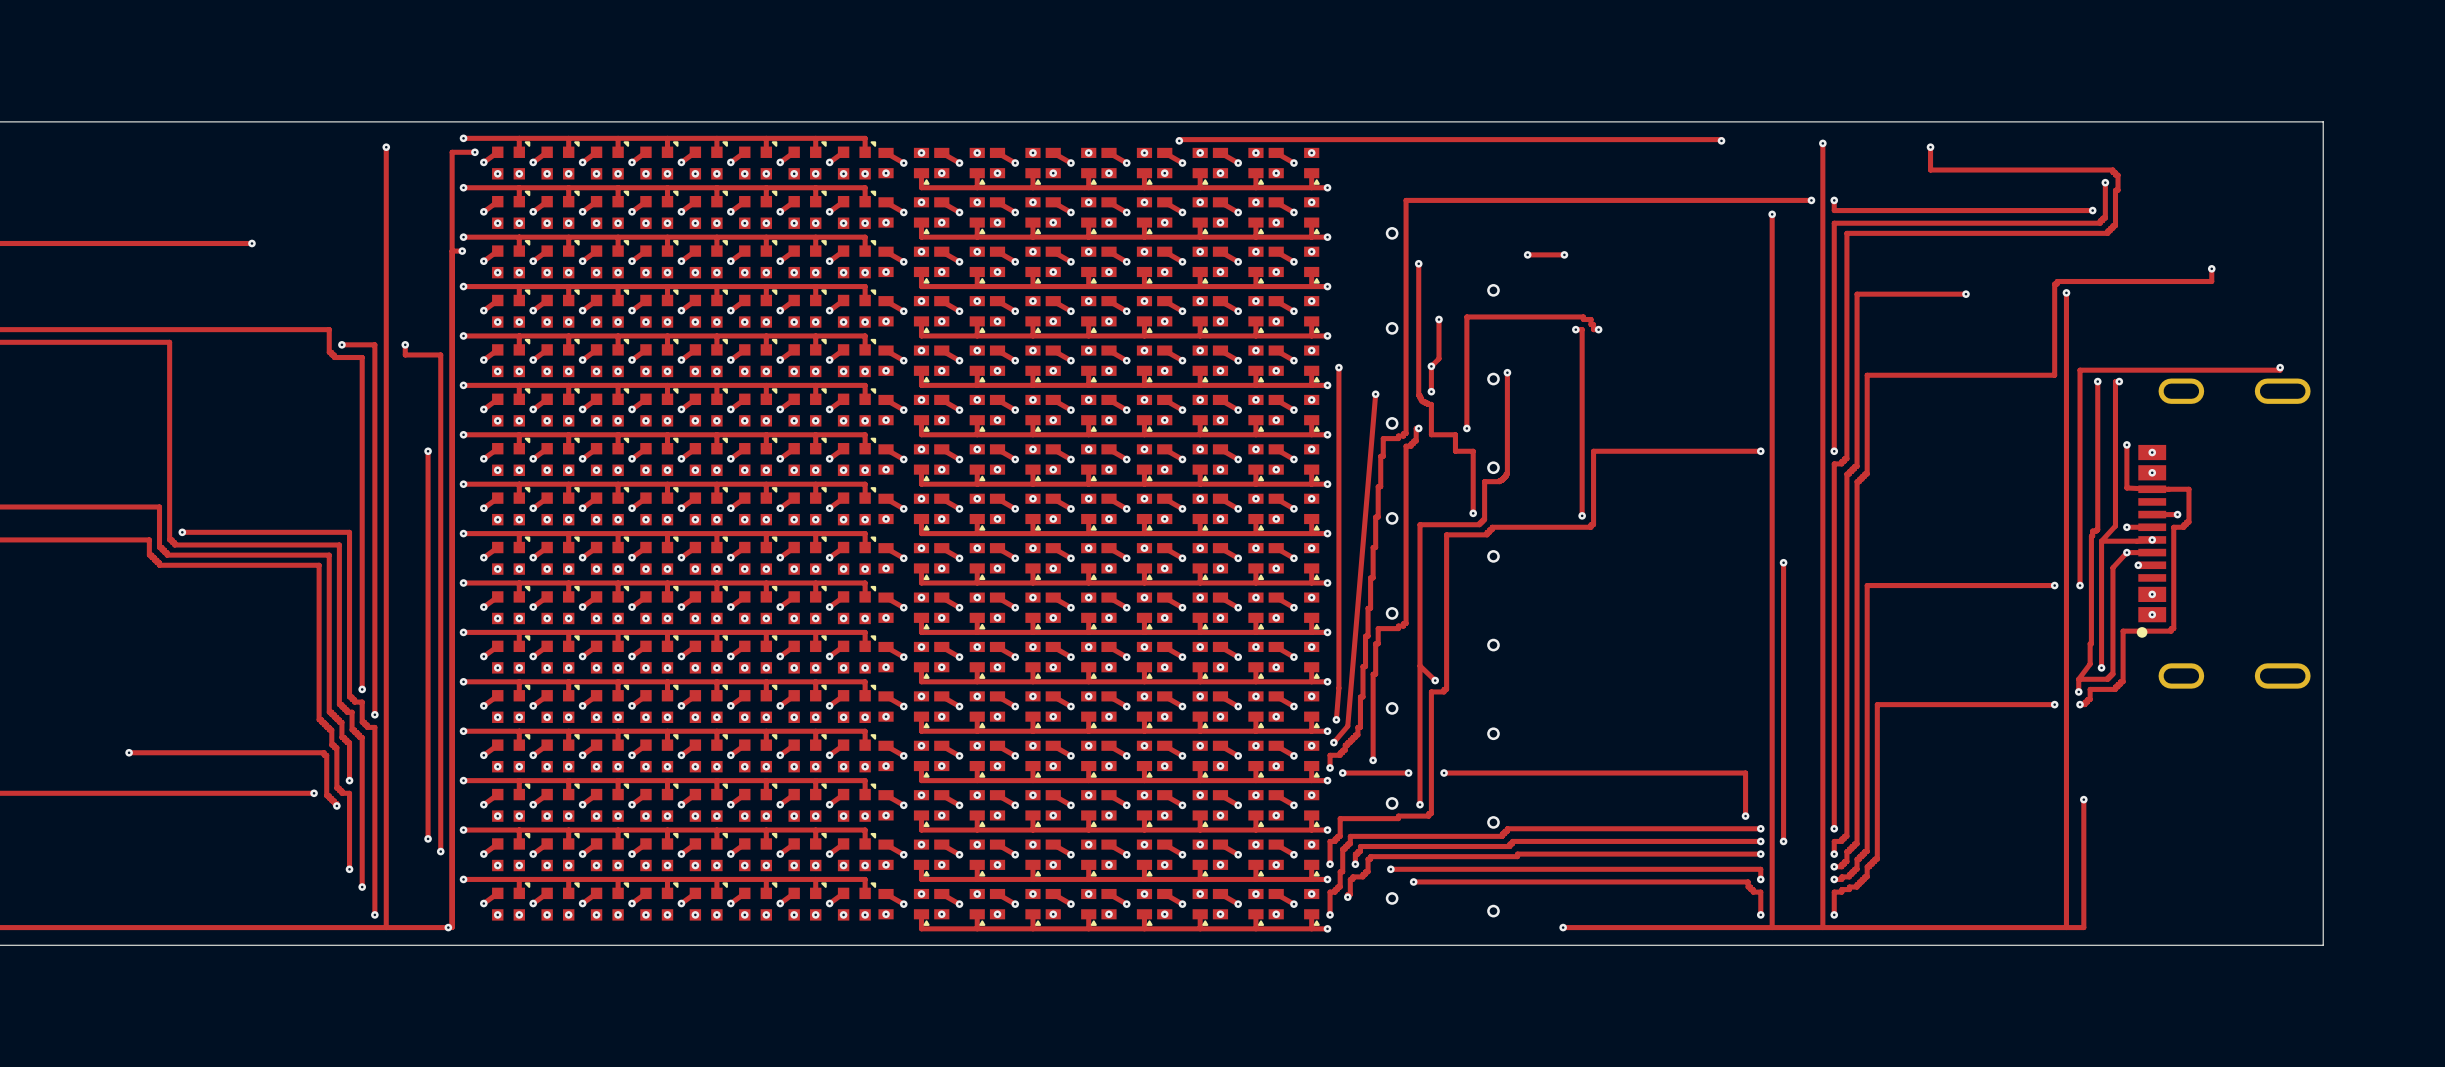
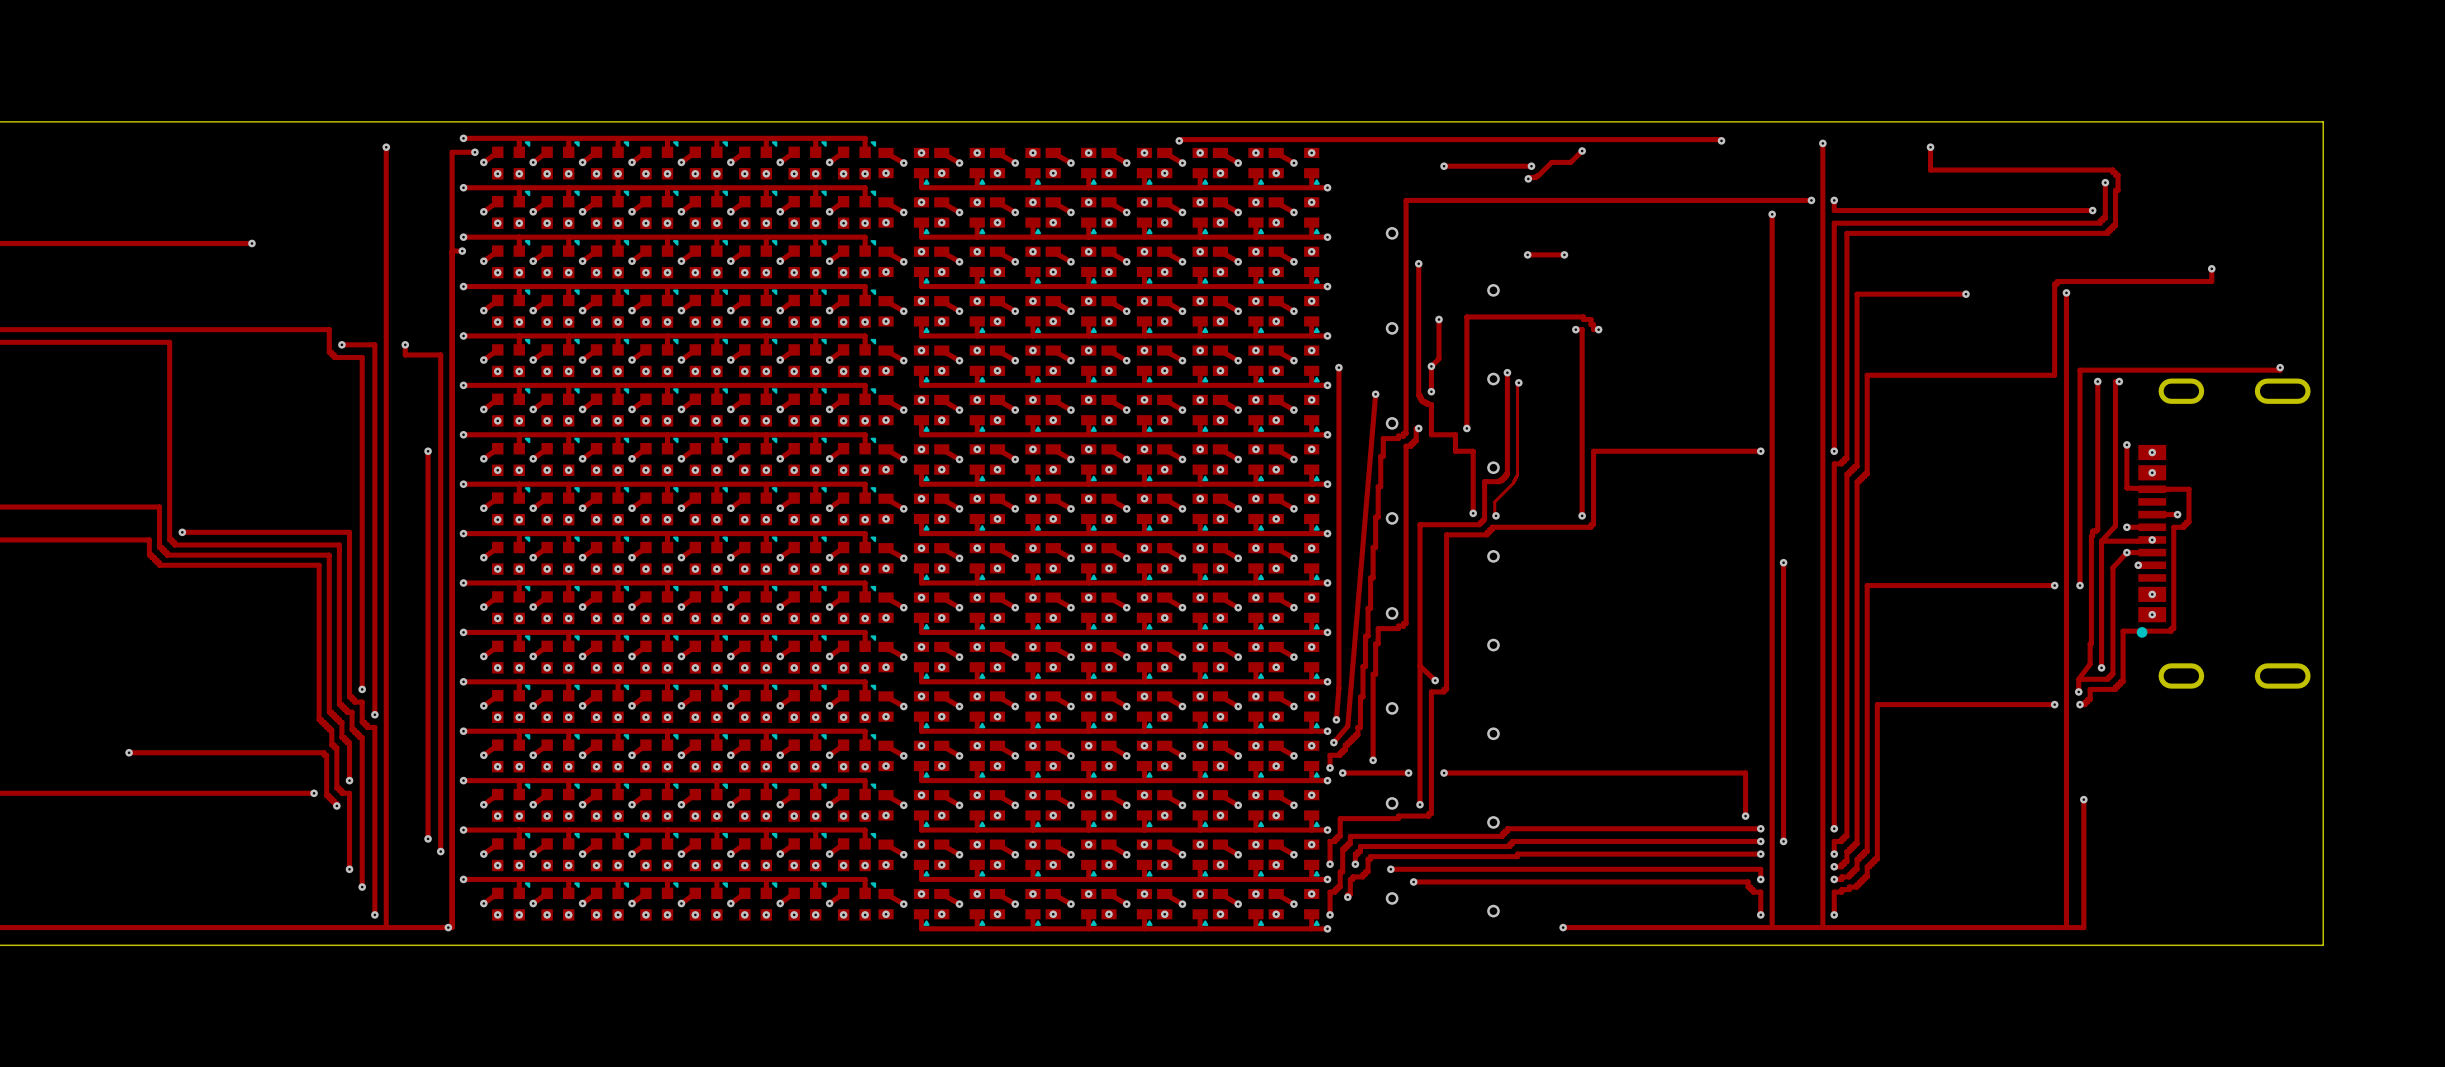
track: none -> (1582, 151) (1570, 162) (1551, 162) (1538, 175) (1528, 178)
via: none -> (1582, 151)
track: none -> (1444, 166) (1531, 166)
via: none -> (1444, 166)
via: none -> (1531, 166)
via: none -> (1528, 178)
track: none -> (1518, 382) (1517, 475) (1513, 482) (1494, 501) (1496, 515)
via: none -> (1518, 382)
via: none -> (1496, 515)

